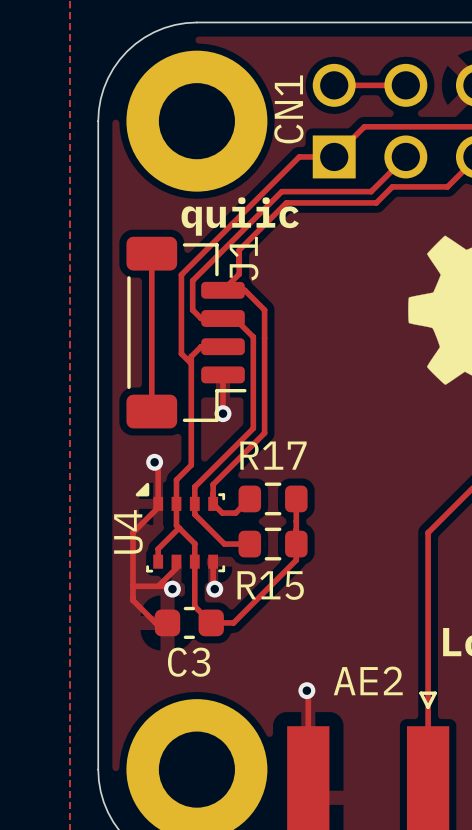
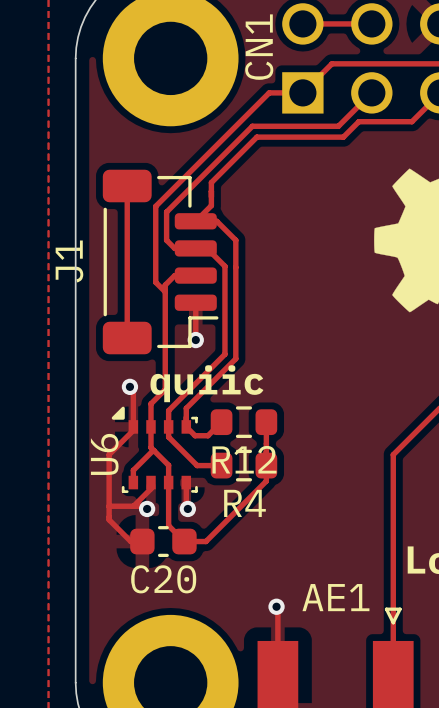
text position: quiic (240, 216) -> quiic (206, 383)
J1 name position: J1 (244, 258) -> J1 (69, 261)
R17 name: R17 (273, 455) -> R12 (244, 459)
U4 name: U4 (128, 531) -> U6 (104, 454)
R15 name: R15 (270, 585) -> R4 (244, 503)
C3 name: C3 (189, 662) -> C20 (163, 579)
AE2 name: AE2 (368, 680) -> AE1 (335, 597)

